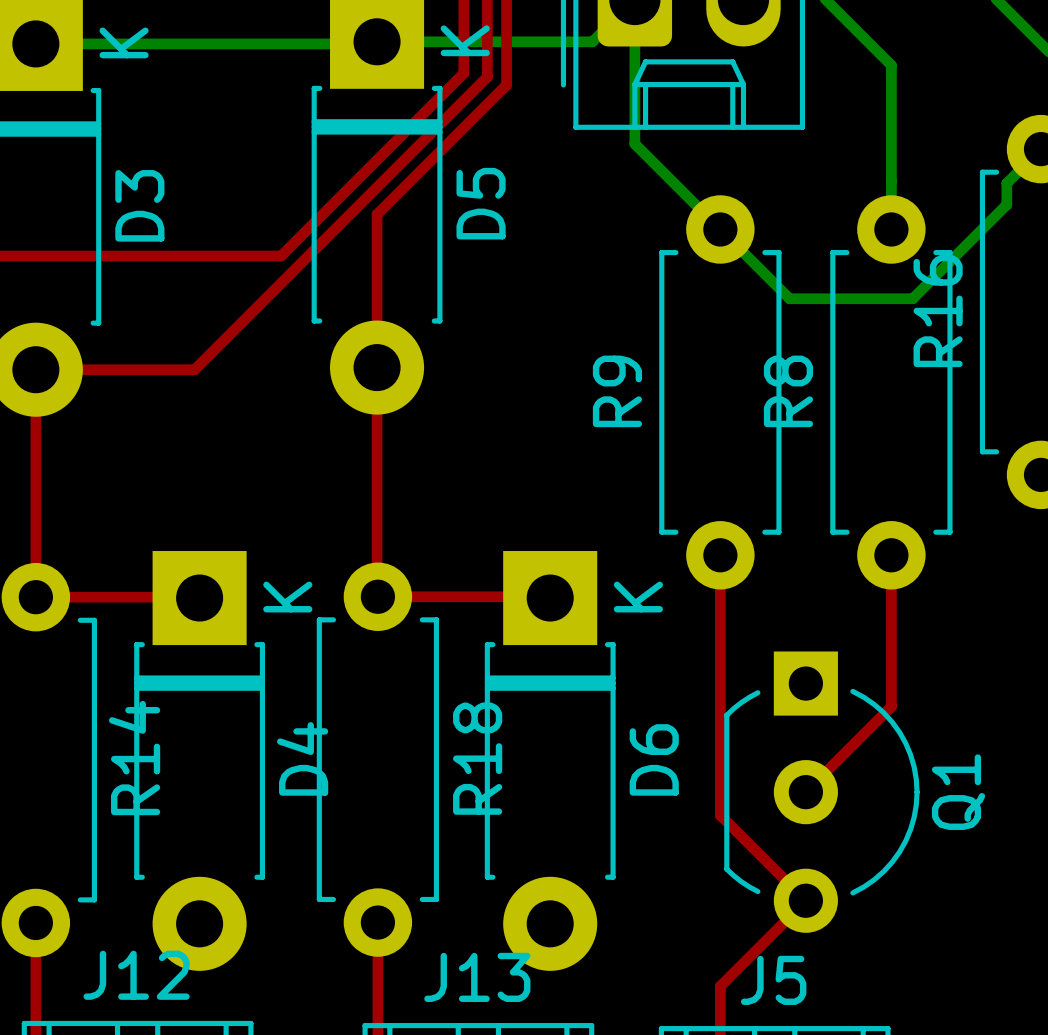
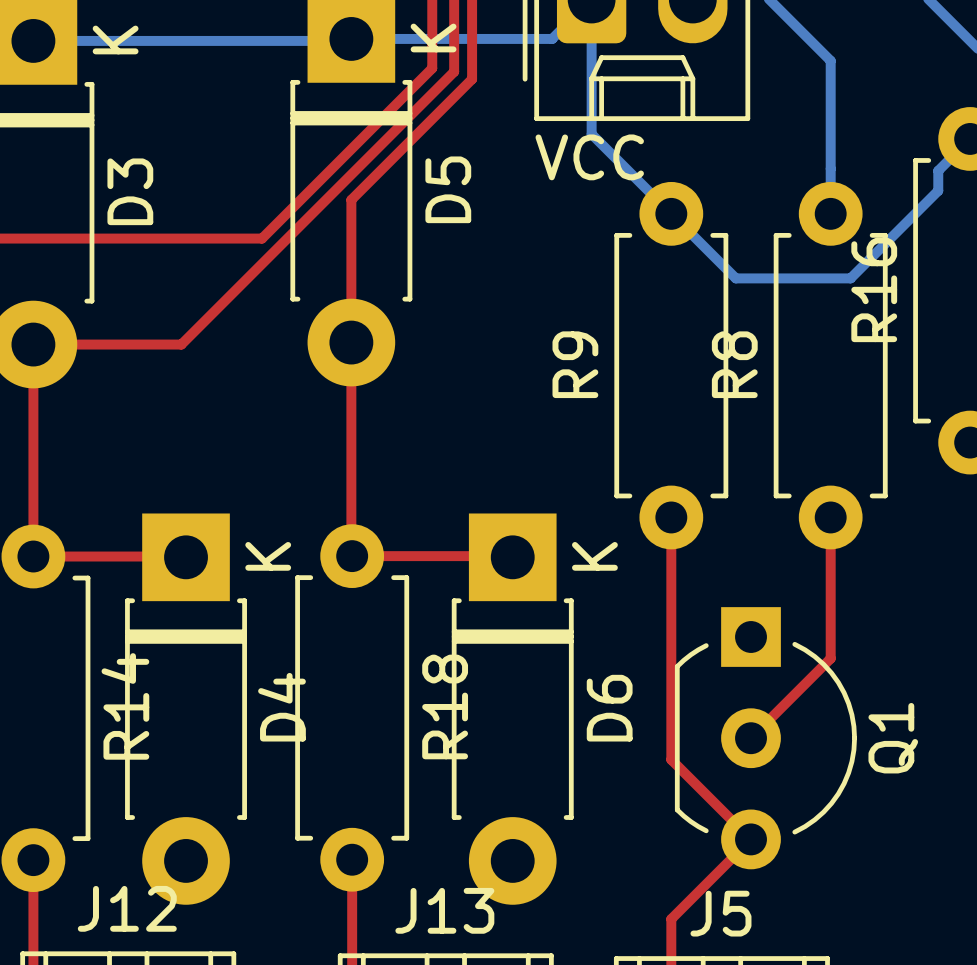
text: none -> VCC (589, 157)

